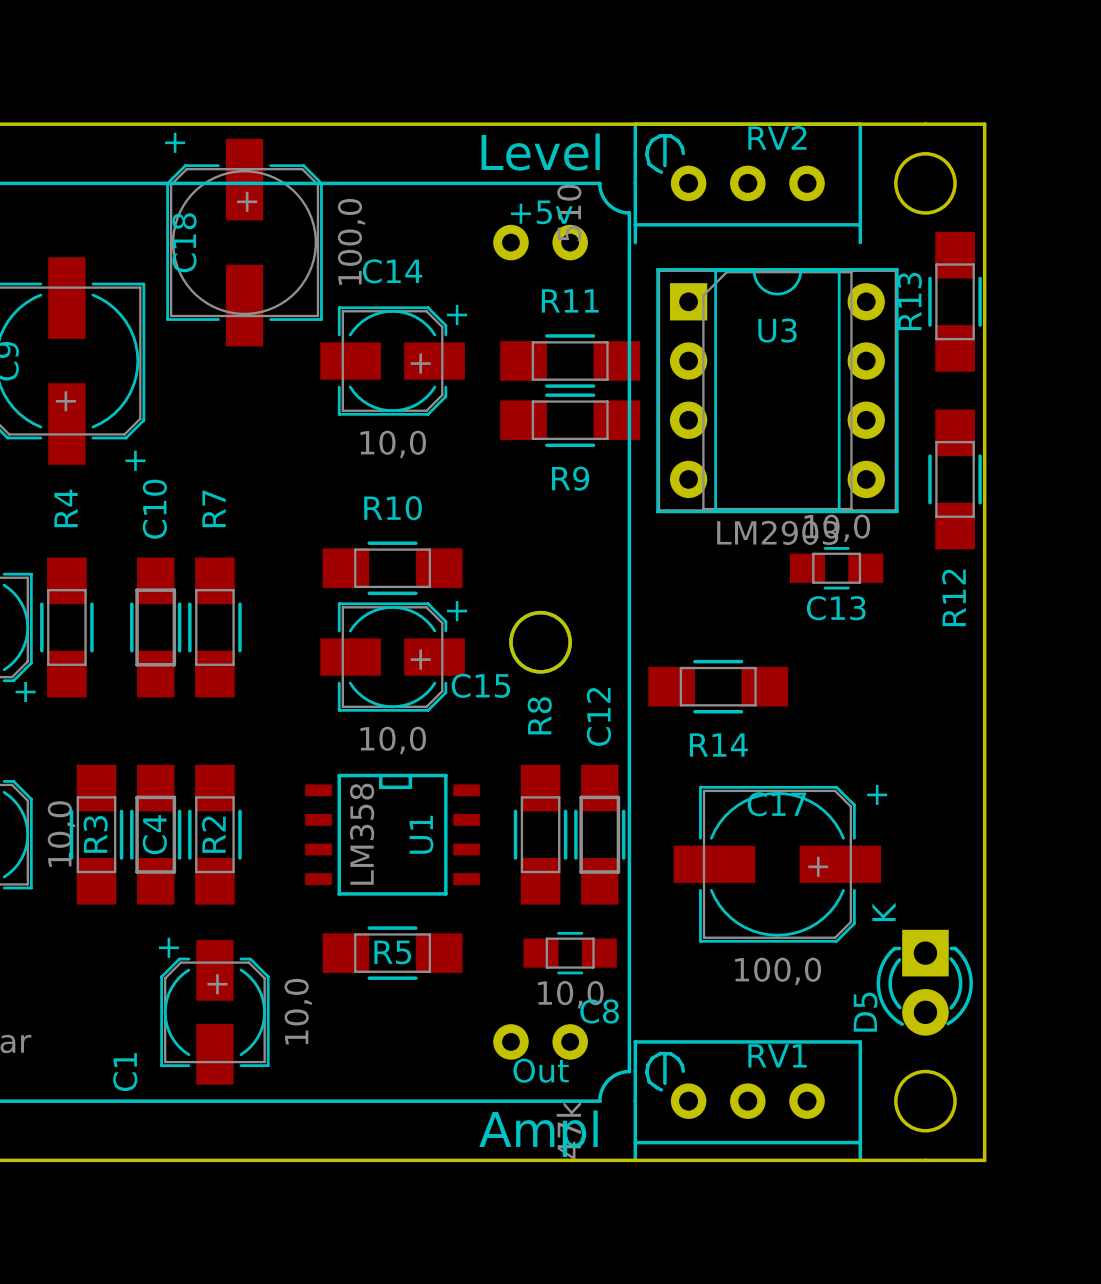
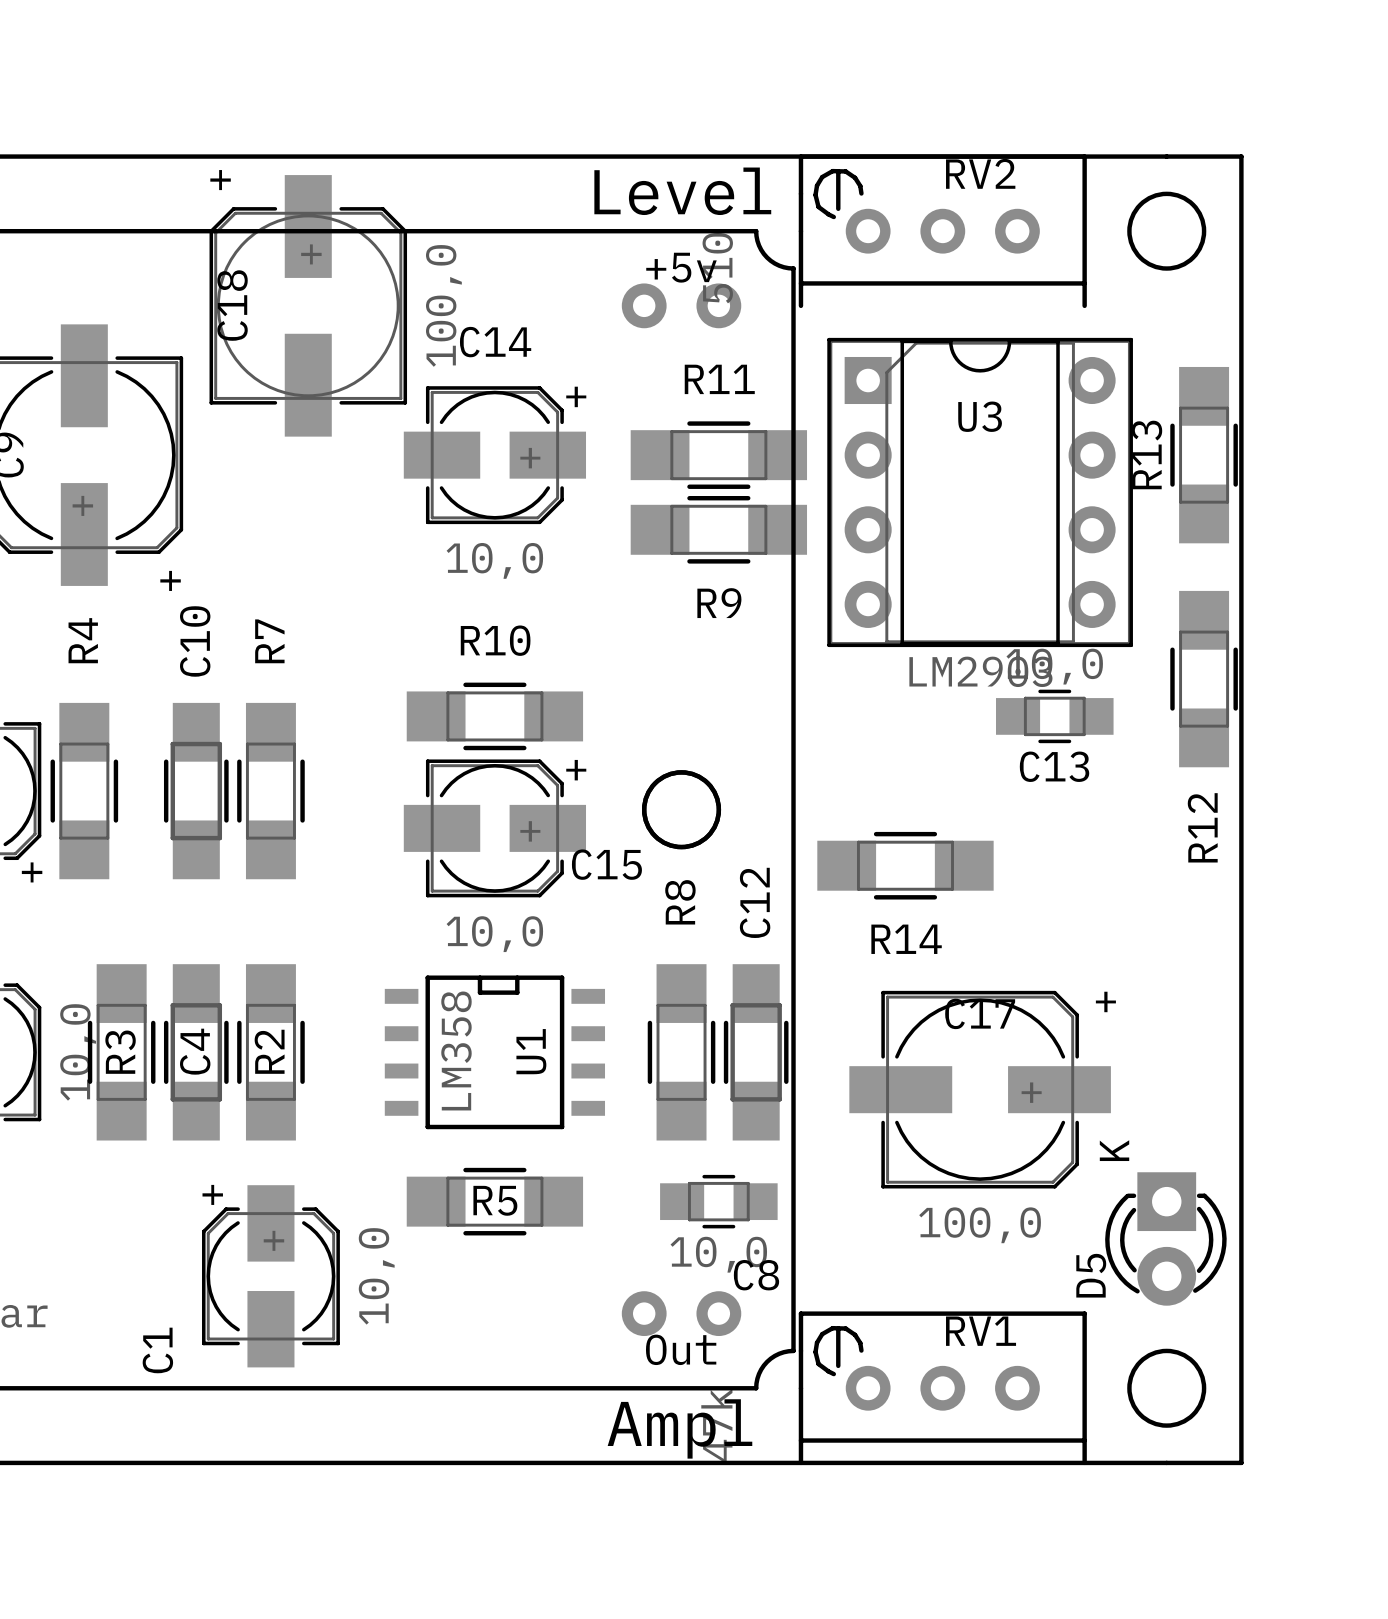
R13 position: (955, 301) -> (1204, 455)
R12 position: (955, 479) -> (1204, 679)

